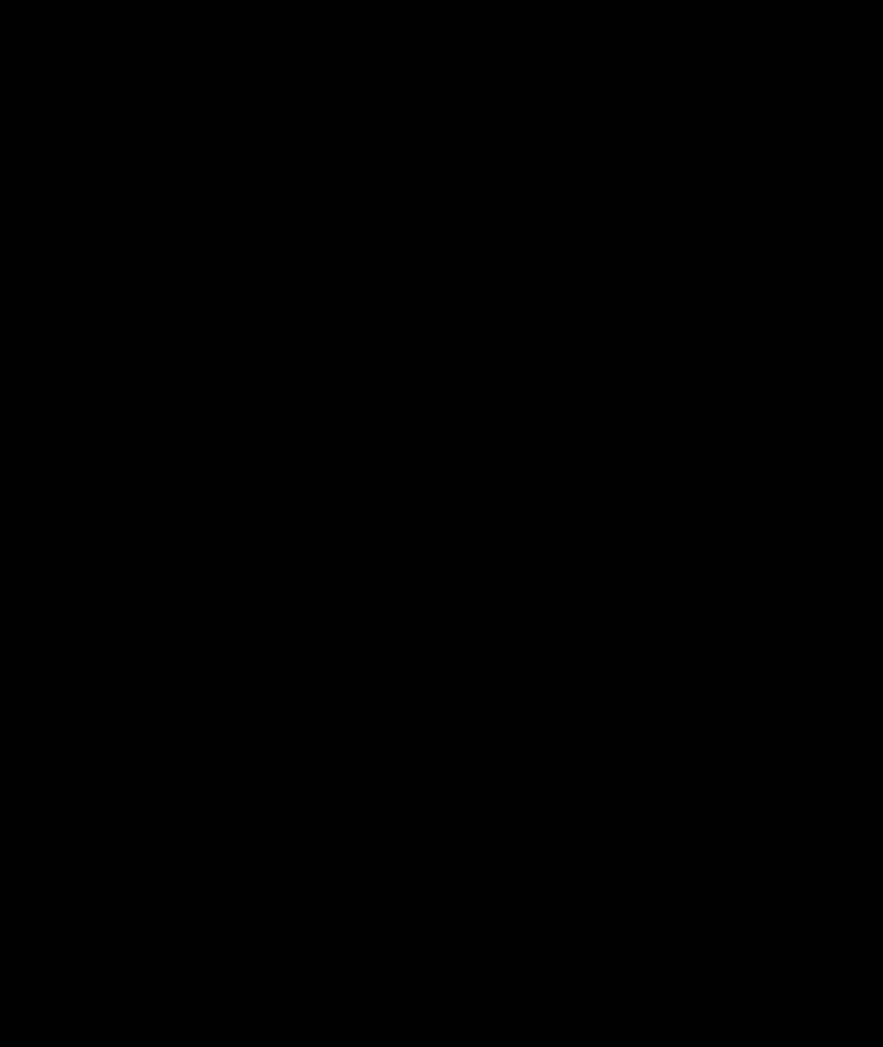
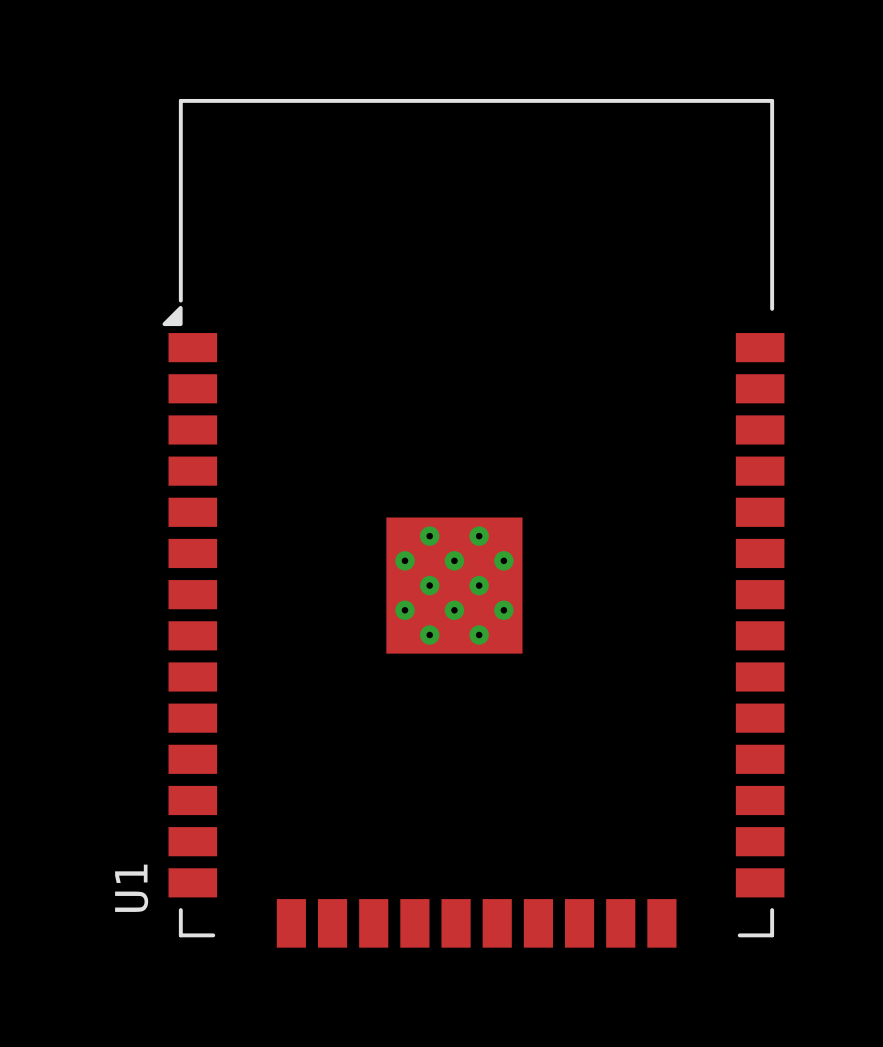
U1: none -> (473, 523)

